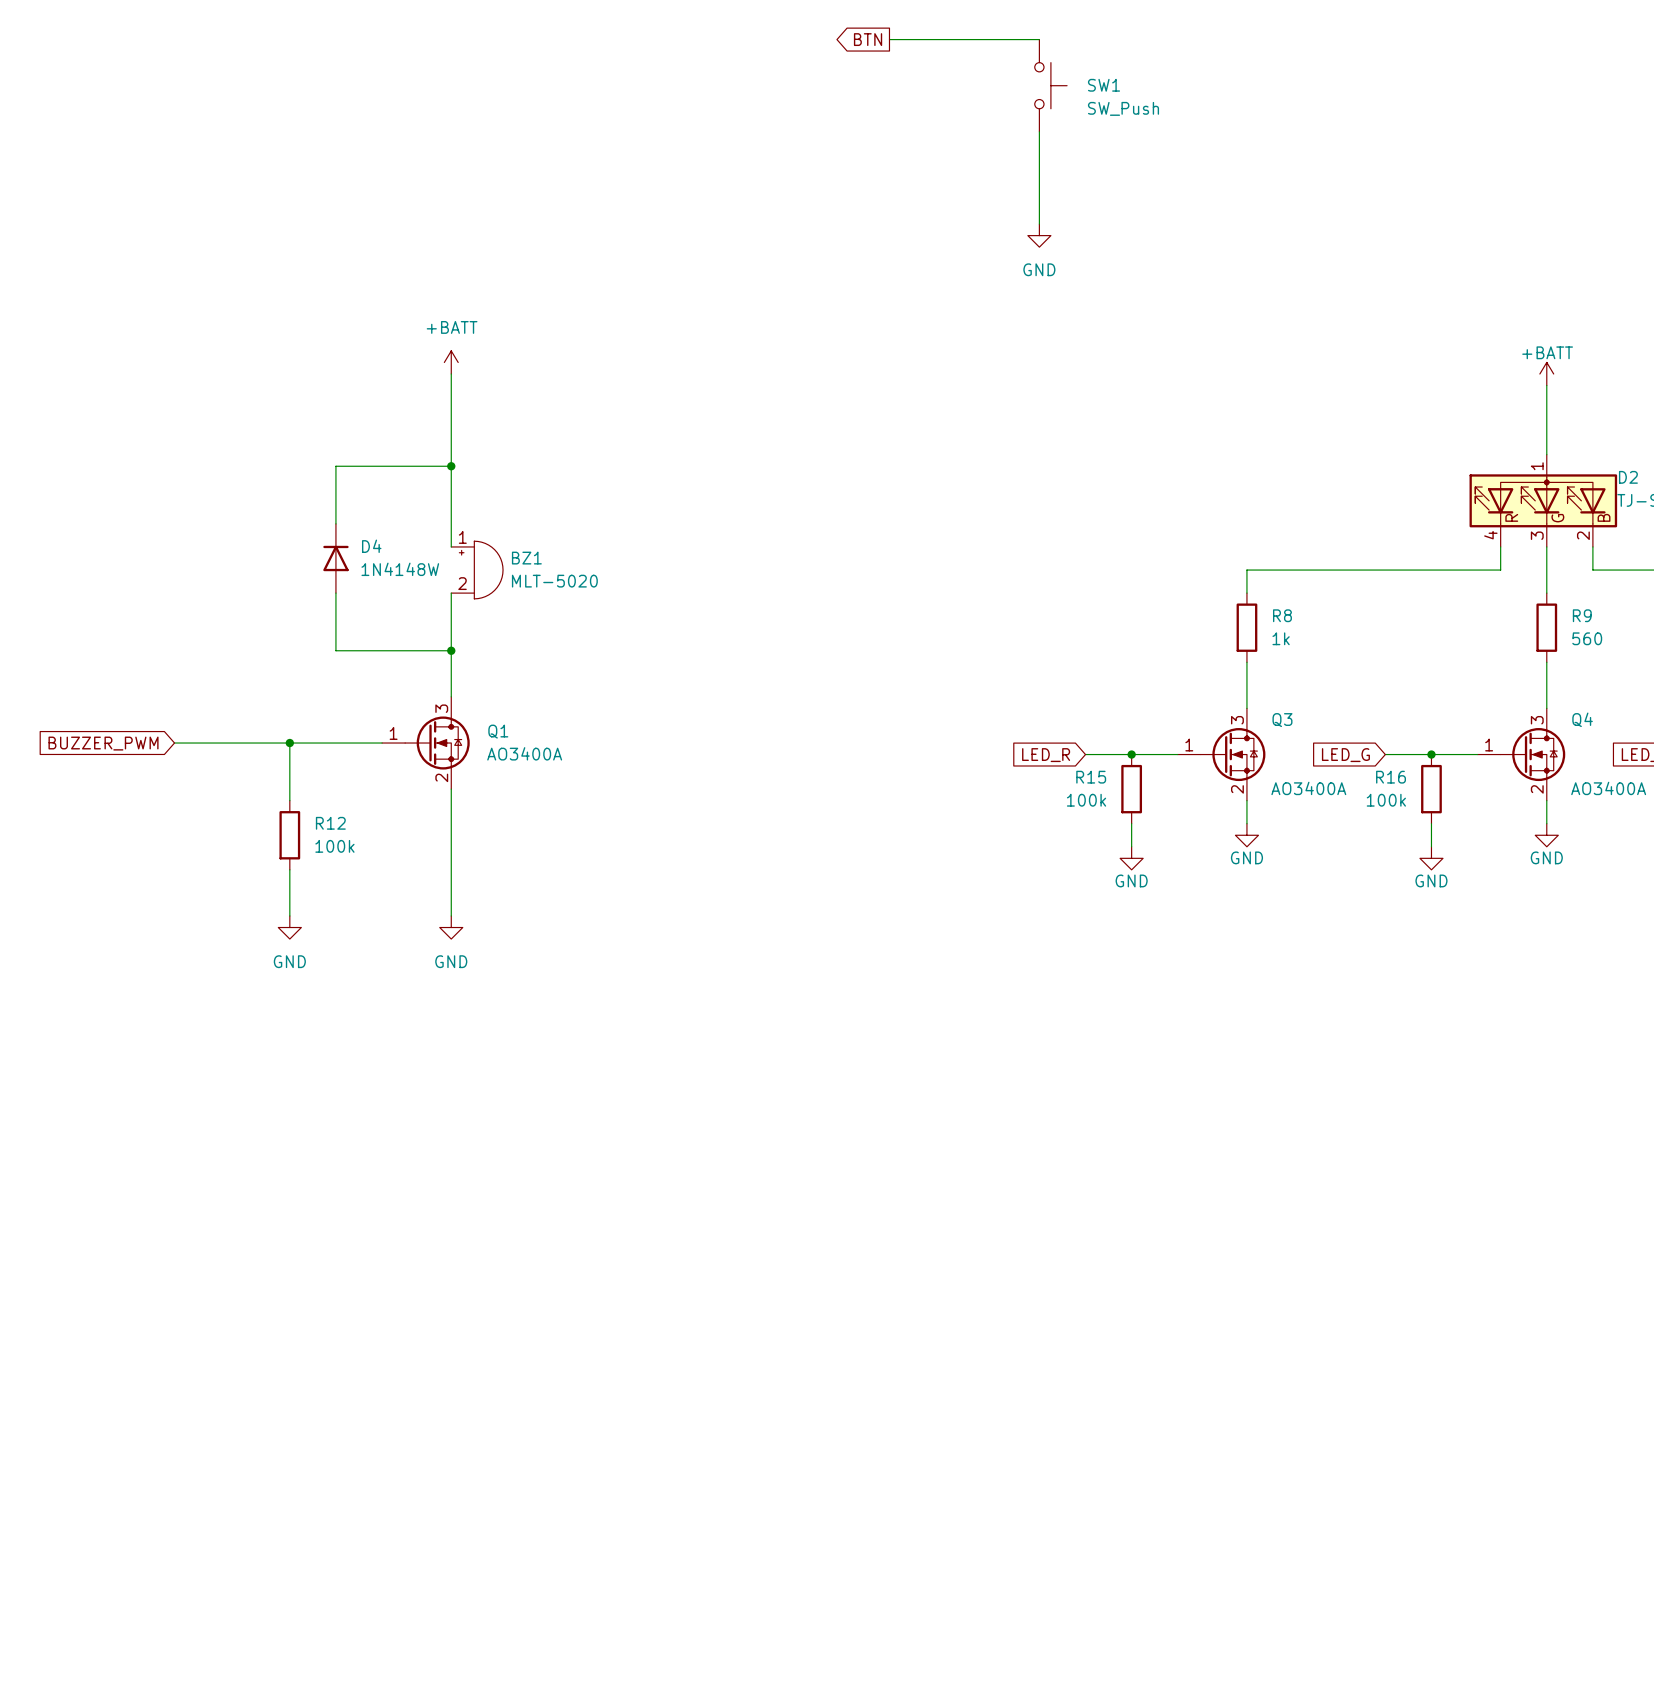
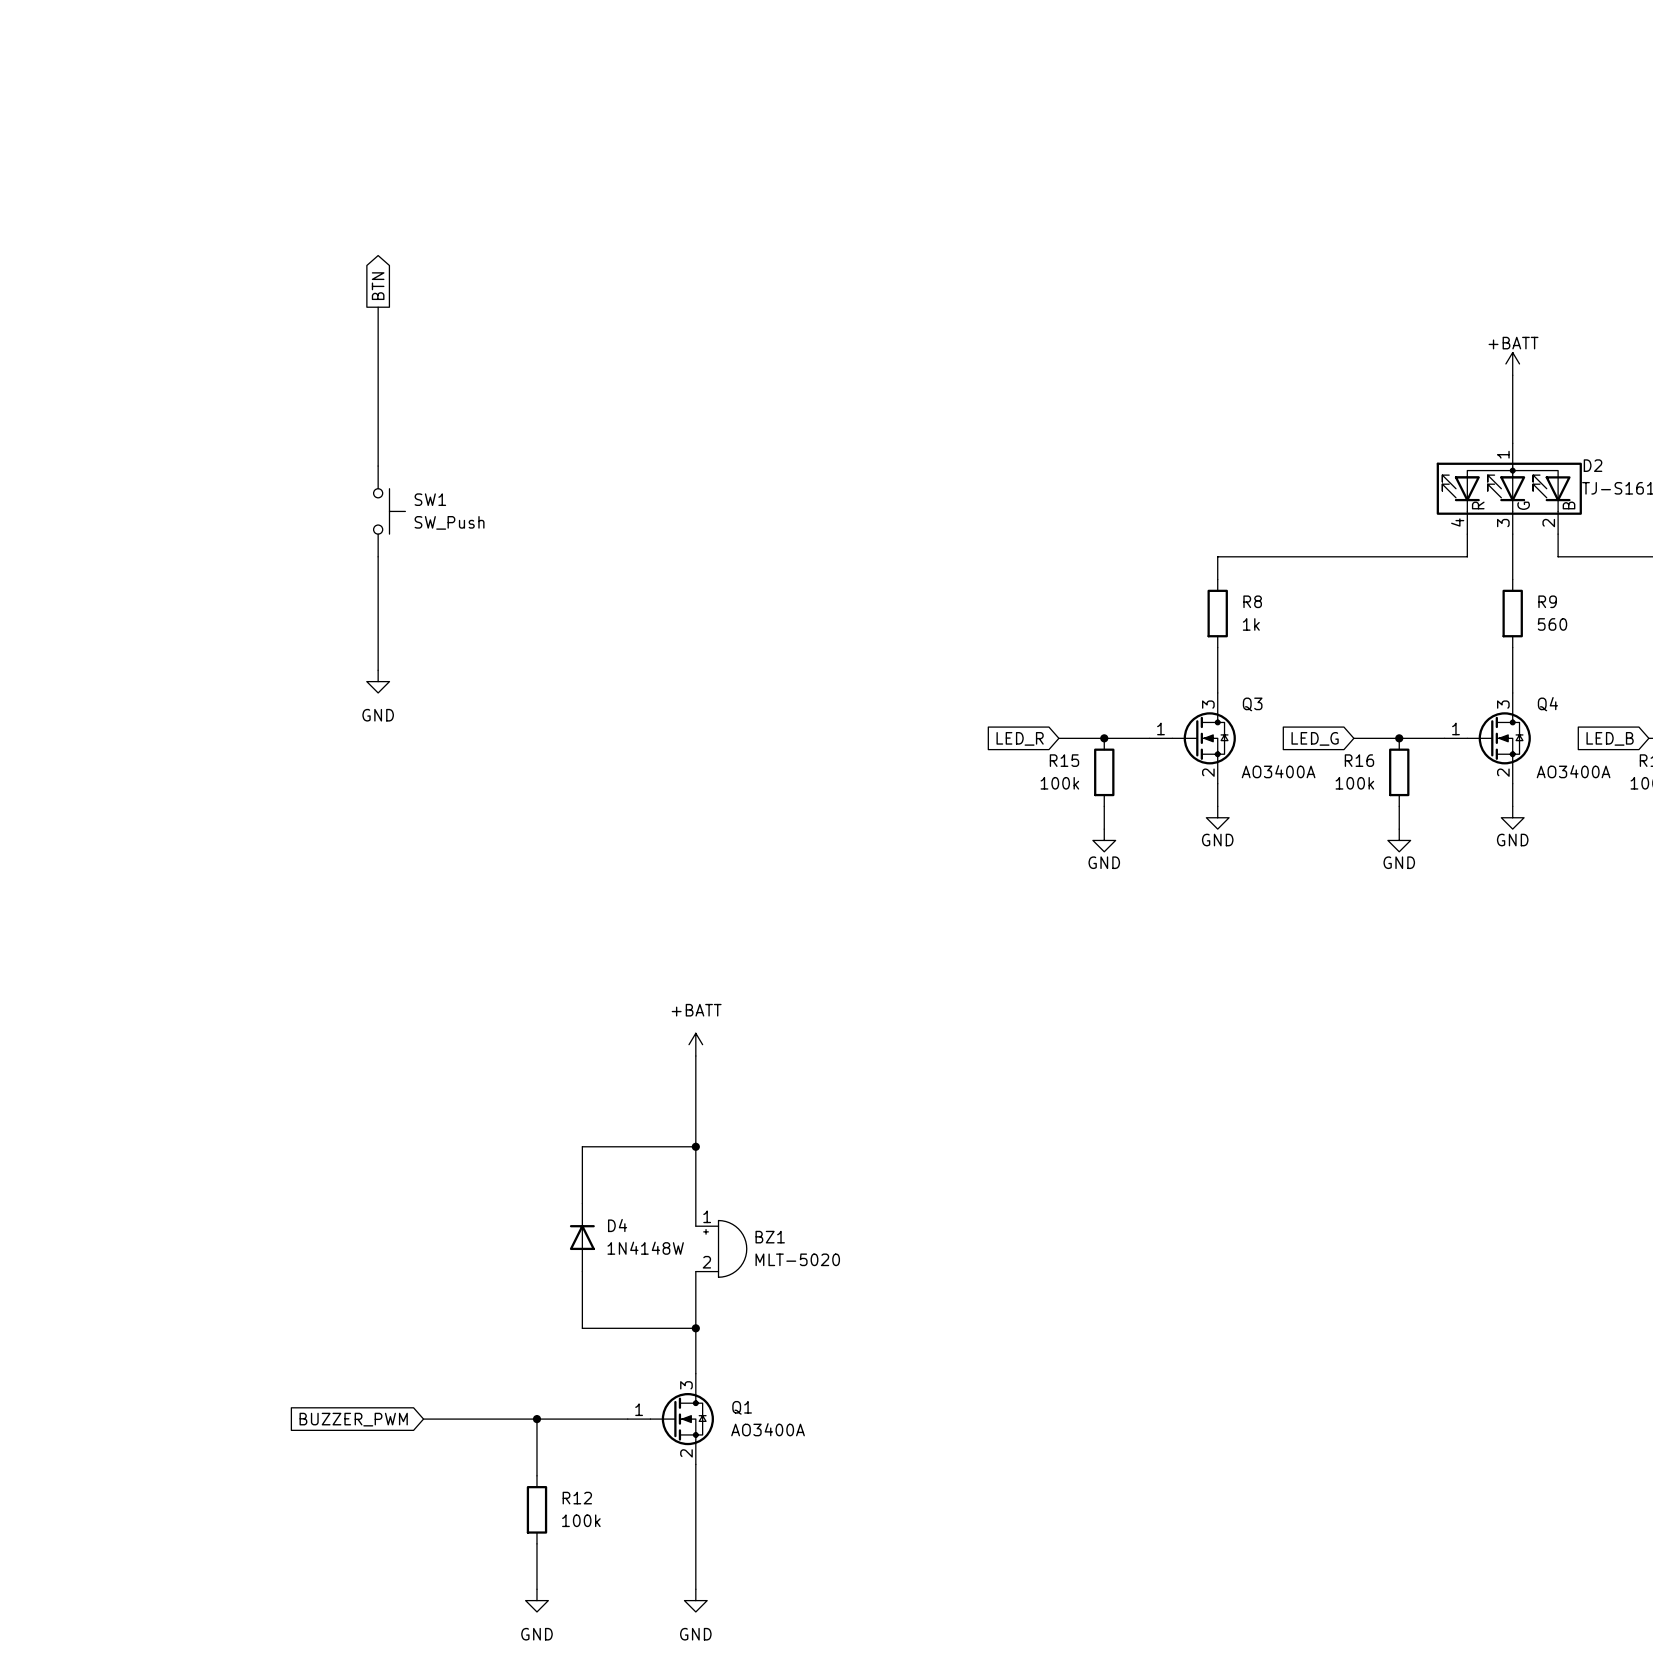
global label: BTN (868, 39) -> none
wire: (889, 39) (1039, 39) -> none
SW1 position: (1050, 85) -> (389, 511)
SW1 name position: SW1 (1104, 85) -> SW1 (430, 499)
SW1 value position: SW_Push (1123, 108) -> SW_Push (449, 522)
wire: (1039, 131) (1039, 224) -> none
power symbol: GND (1039, 235) -> none
global label: none -> BTN (378, 286)
wire: none -> (378, 307) (378, 466)
power symbol: +BATT (451, 362) -> none
wire: (451, 373) (451, 546) -> none
wire: (451, 466) (335, 466) (335, 523) -> none
junction: (451, 466) -> none
D4 position: (335, 558) -> (582, 1237)
wire: none -> (378, 556) (378, 670)
BZ1 position: (477, 570) -> (721, 1248)
wire: (335, 593) (335, 650) (451, 650) -> none
wire: (451, 593) (451, 696) -> none
junction: (451, 650) -> none
power symbol: none -> GND (378, 681)
global label: BUZZER_PWM (103, 743) -> none
wire: (174, 743) (382, 743) -> none
wire: (289, 743) (289, 800) -> none
junction: (289, 743) -> none
Q1 position: (425, 743) -> (670, 1419)
wire: (451, 789) (451, 915) -> none
R12 position: (289, 835) -> (536, 1509)
wire: (289, 869) (289, 915) -> none
power symbol: GND (289, 927) -> none
power symbol: GND (451, 927) -> none
power symbol: none -> +BATT (695, 1044)
wire: none -> (695, 1056) (695, 1226)
wire: none -> (695, 1146) (582, 1146) (582, 1203)
junction: none -> (695, 1146)
wire: none -> (582, 1271) (582, 1328) (695, 1328)
wire: none -> (695, 1271) (695, 1373)
junction: none -> (695, 1328)
global label: none -> BUZZER_PWM (353, 1419)
wire: none -> (423, 1419) (627, 1419)
wire: none -> (536, 1419) (536, 1475)
junction: none -> (536, 1419)
wire: none -> (695, 1464) (695, 1589)
wire: none -> (536, 1543) (536, 1589)
power symbol: none -> GND (536, 1600)
power symbol: none -> GND (695, 1600)

